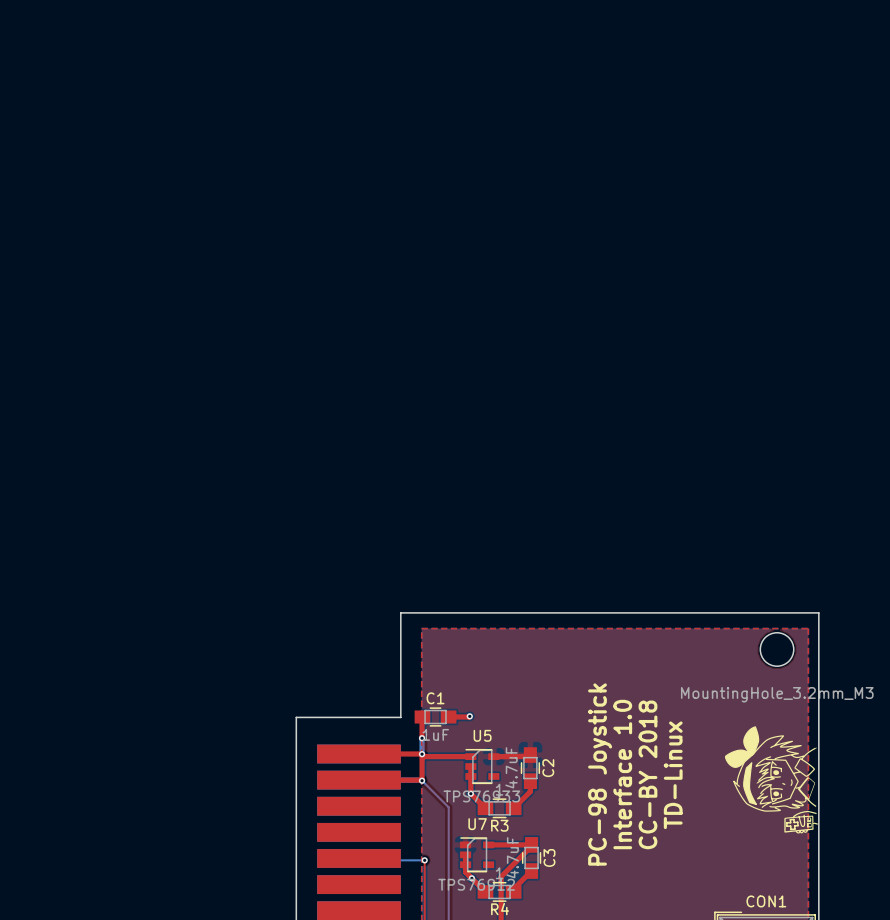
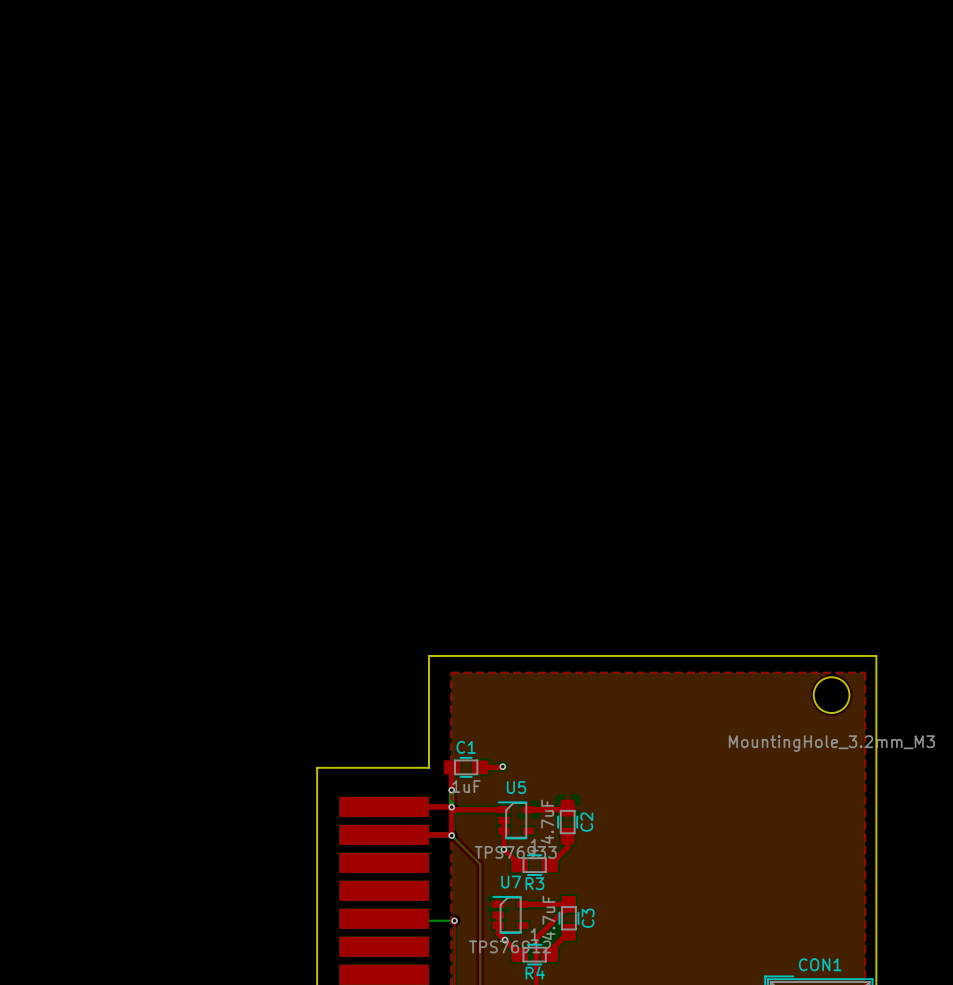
drawing: [724, 726, 819, 834] -> none
text: PC-98 Joystick (600, 774) -> none
text: Interface 1.0 (622, 774) -> none
text: CC-BY 2018 (647, 774) -> none
text: TD-Linux (673, 775) -> none

